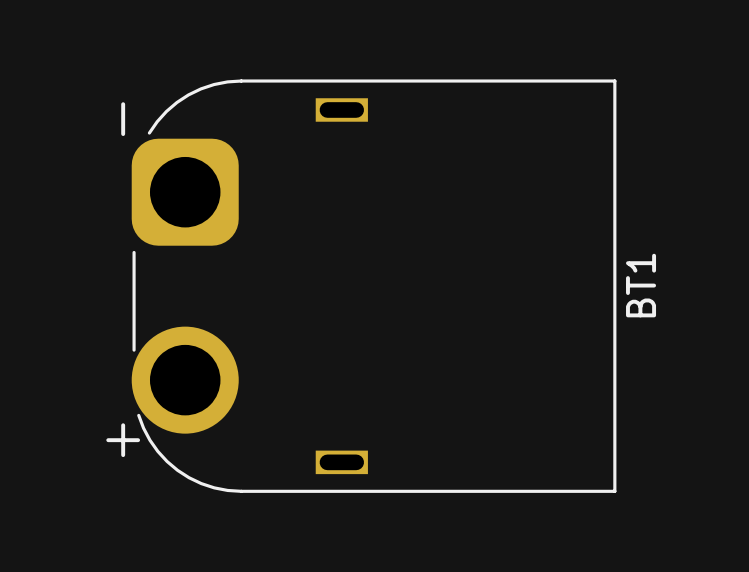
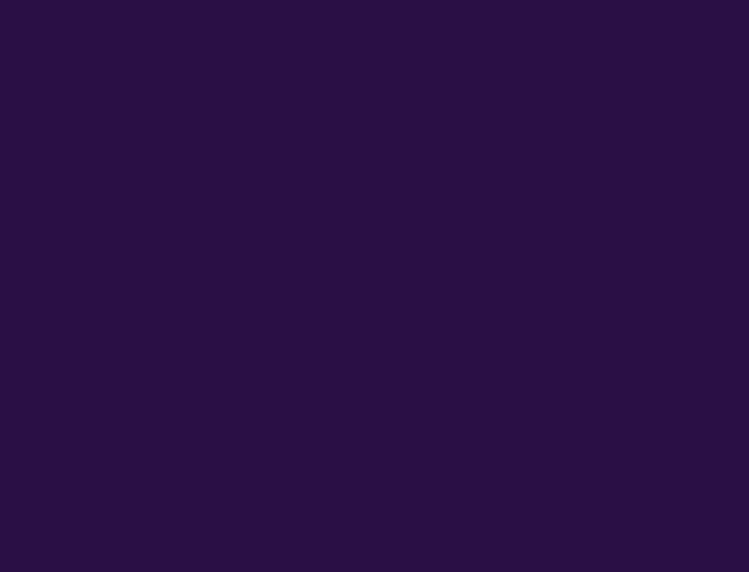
BT1: (374, 286) -> none

